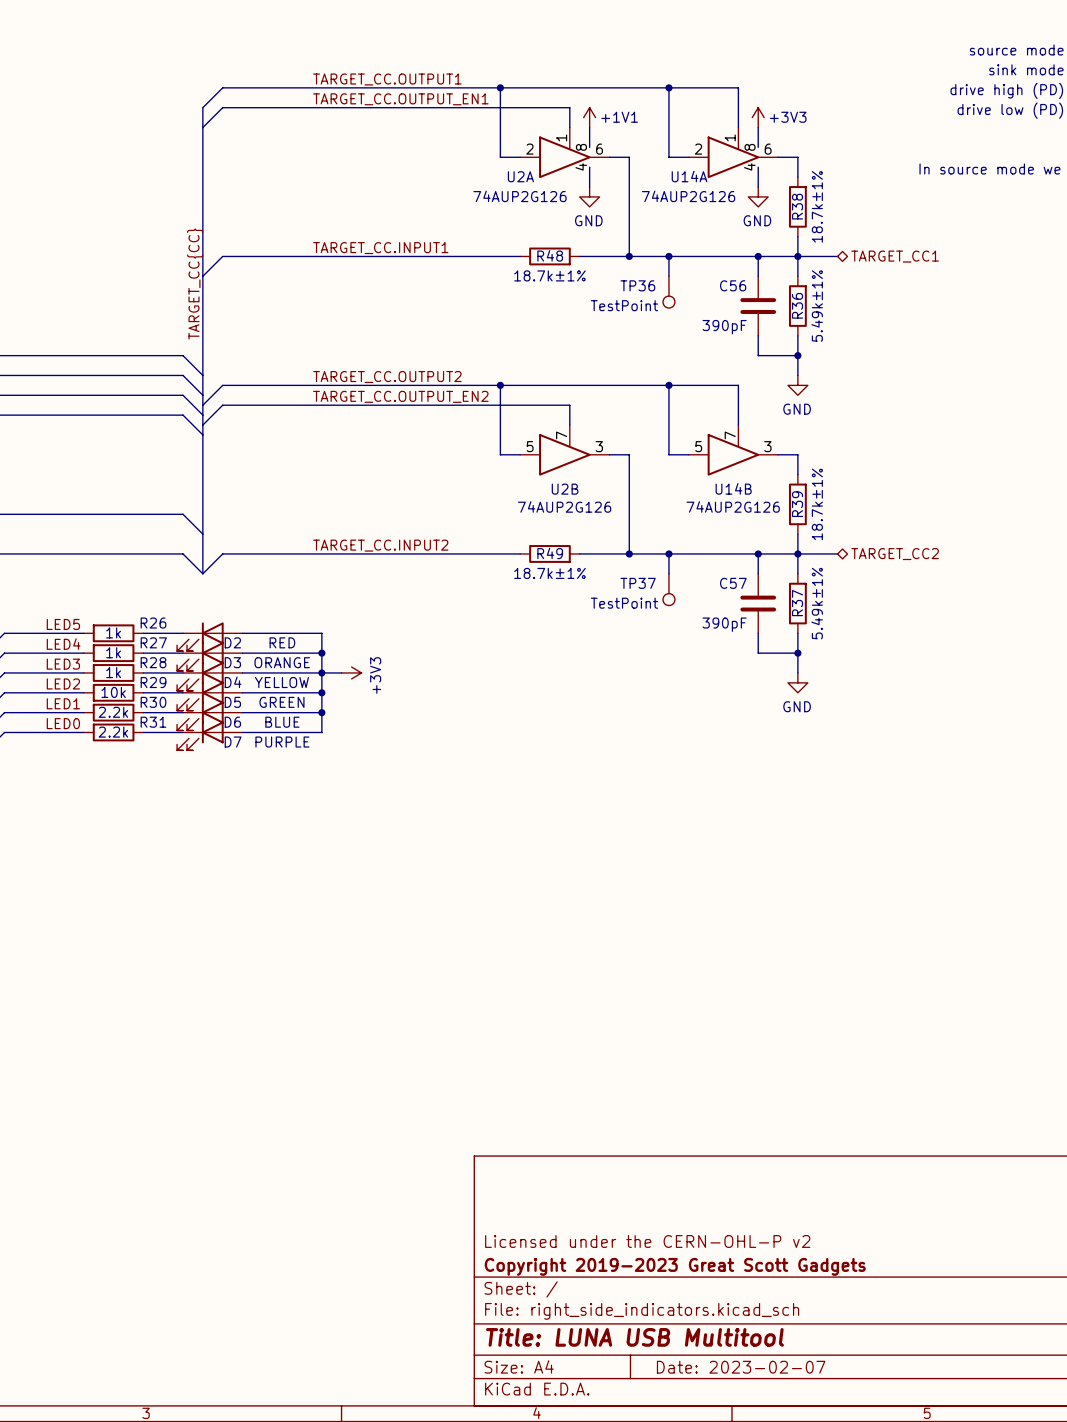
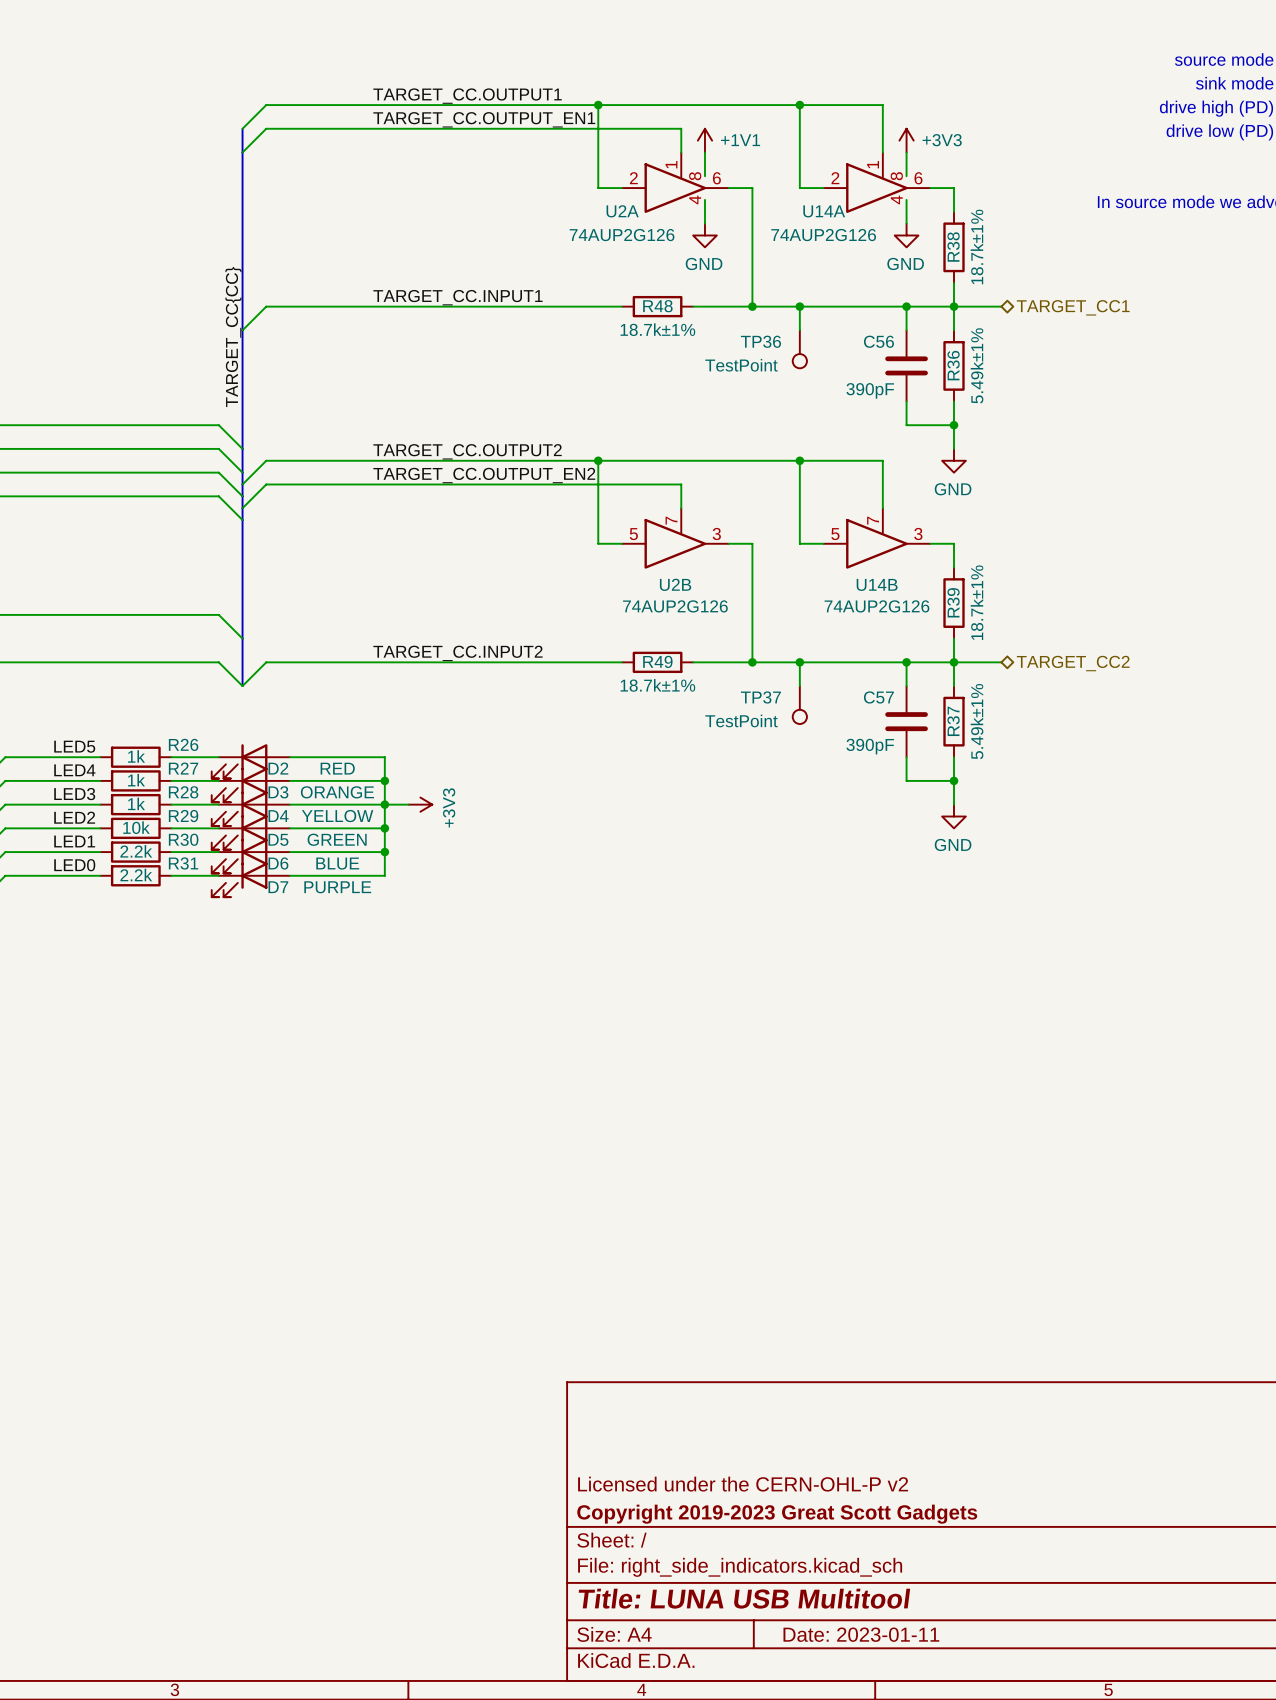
title block: Date: 2023-02-07 (741, 1367) -> Date: 2023-01-11 (861, 1634)

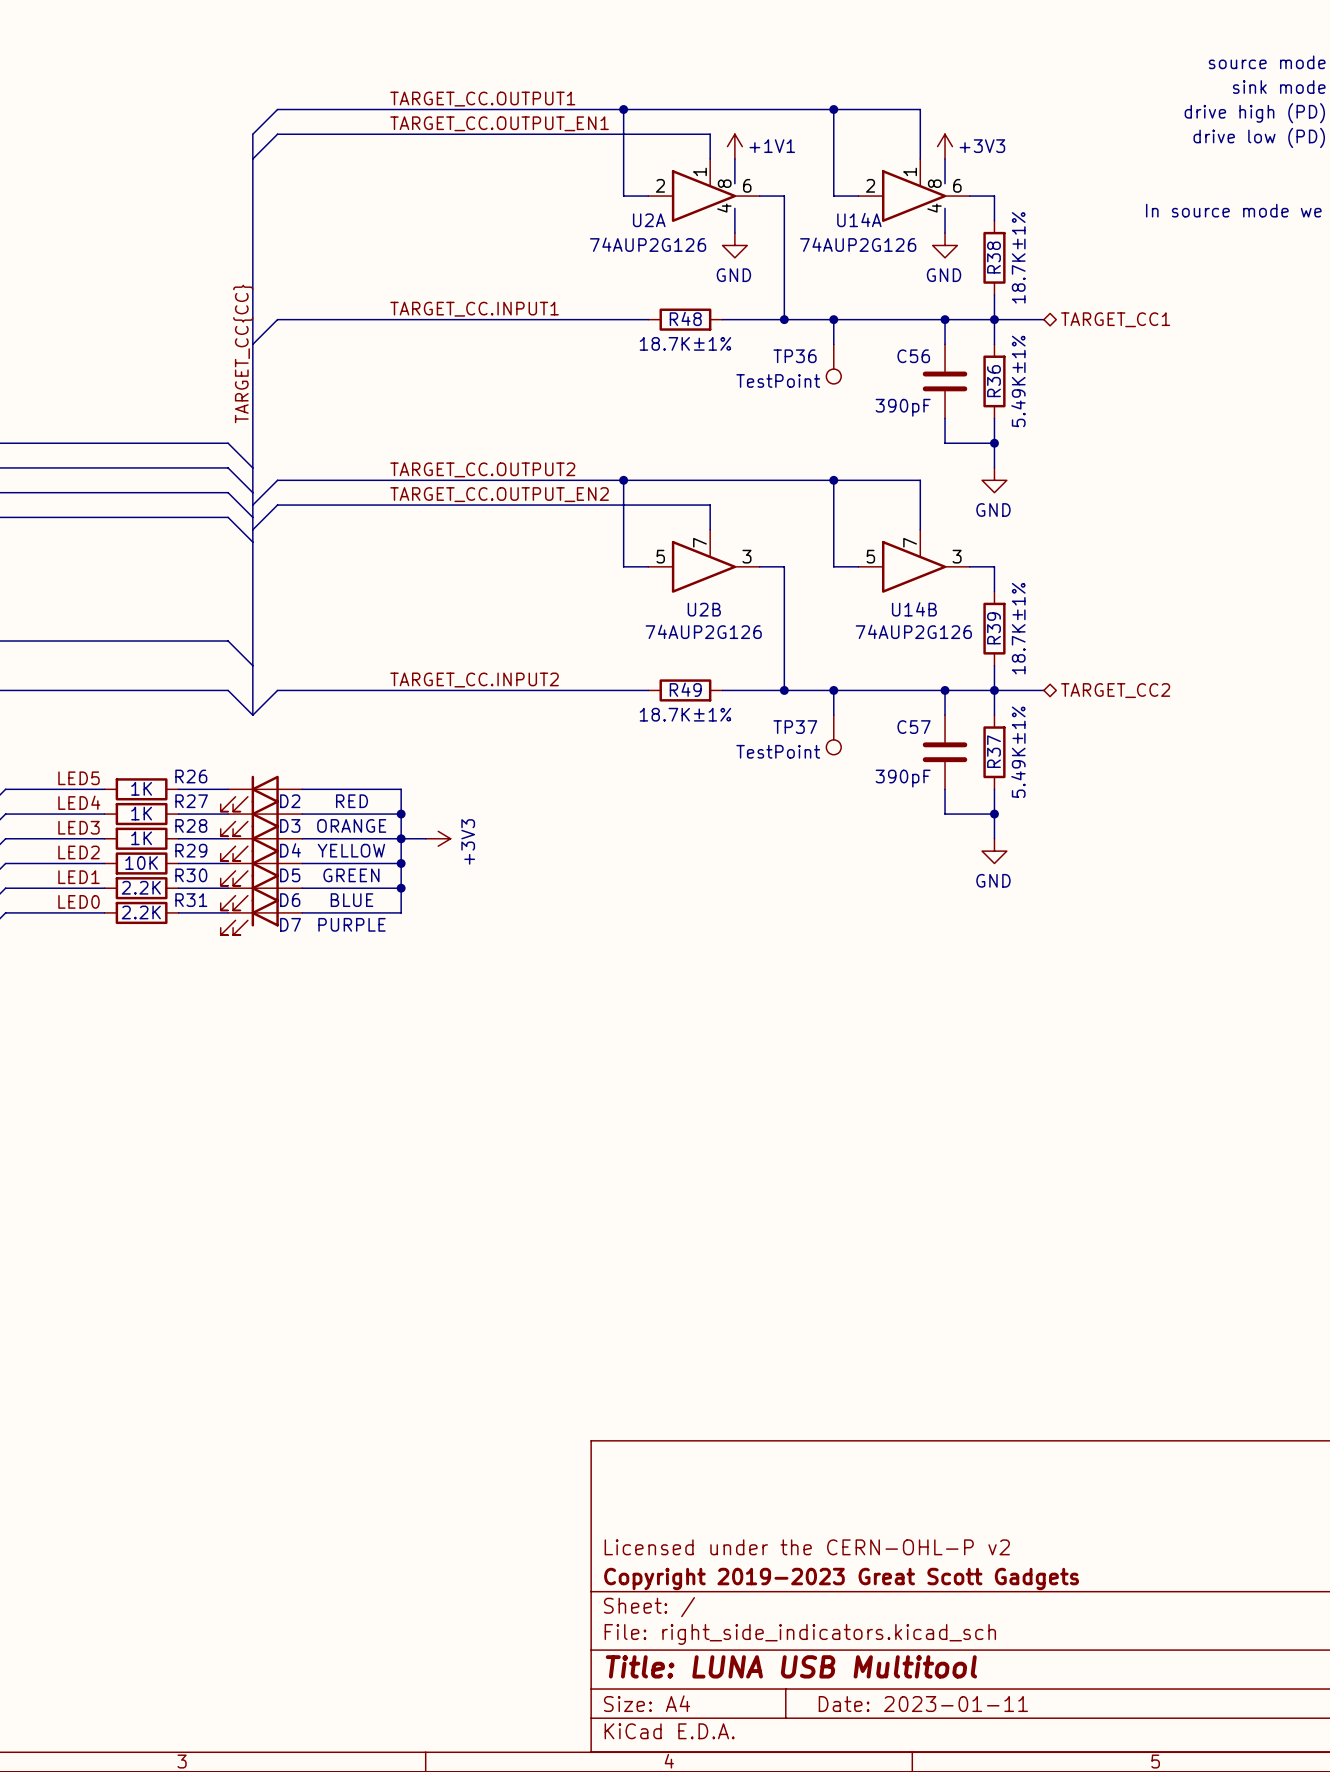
R38 value: 18.7k±1% (977, 246) -> 18.7K±1% (1018, 257)
R48 value: 18.7k±1% (657, 329) -> 18.7K±1% (685, 343)
R36 value: 5.49k±1% (977, 365) -> 5.49K±1% (1018, 381)
R39 value: 18.7k±1% (977, 602) -> 18.7K±1% (1018, 628)
R49 value: 18.7k±1% (657, 685) -> 18.7K±1% (685, 714)
R37 value: 5.49k±1% (977, 721) -> 5.49K±1% (1018, 752)
R26 value: 1k (136, 756) -> 1K (141, 788)
R27 value: 1k (136, 780) -> 1K (141, 813)
R28 value: 1k (136, 803) -> 1K (141, 838)
R29 value: 10k (136, 827) -> 10K (141, 863)
R30 value: 2.2k (136, 851) -> 2.2K (141, 887)
R31 value: 2.2k (136, 875) -> 2.2K (141, 912)

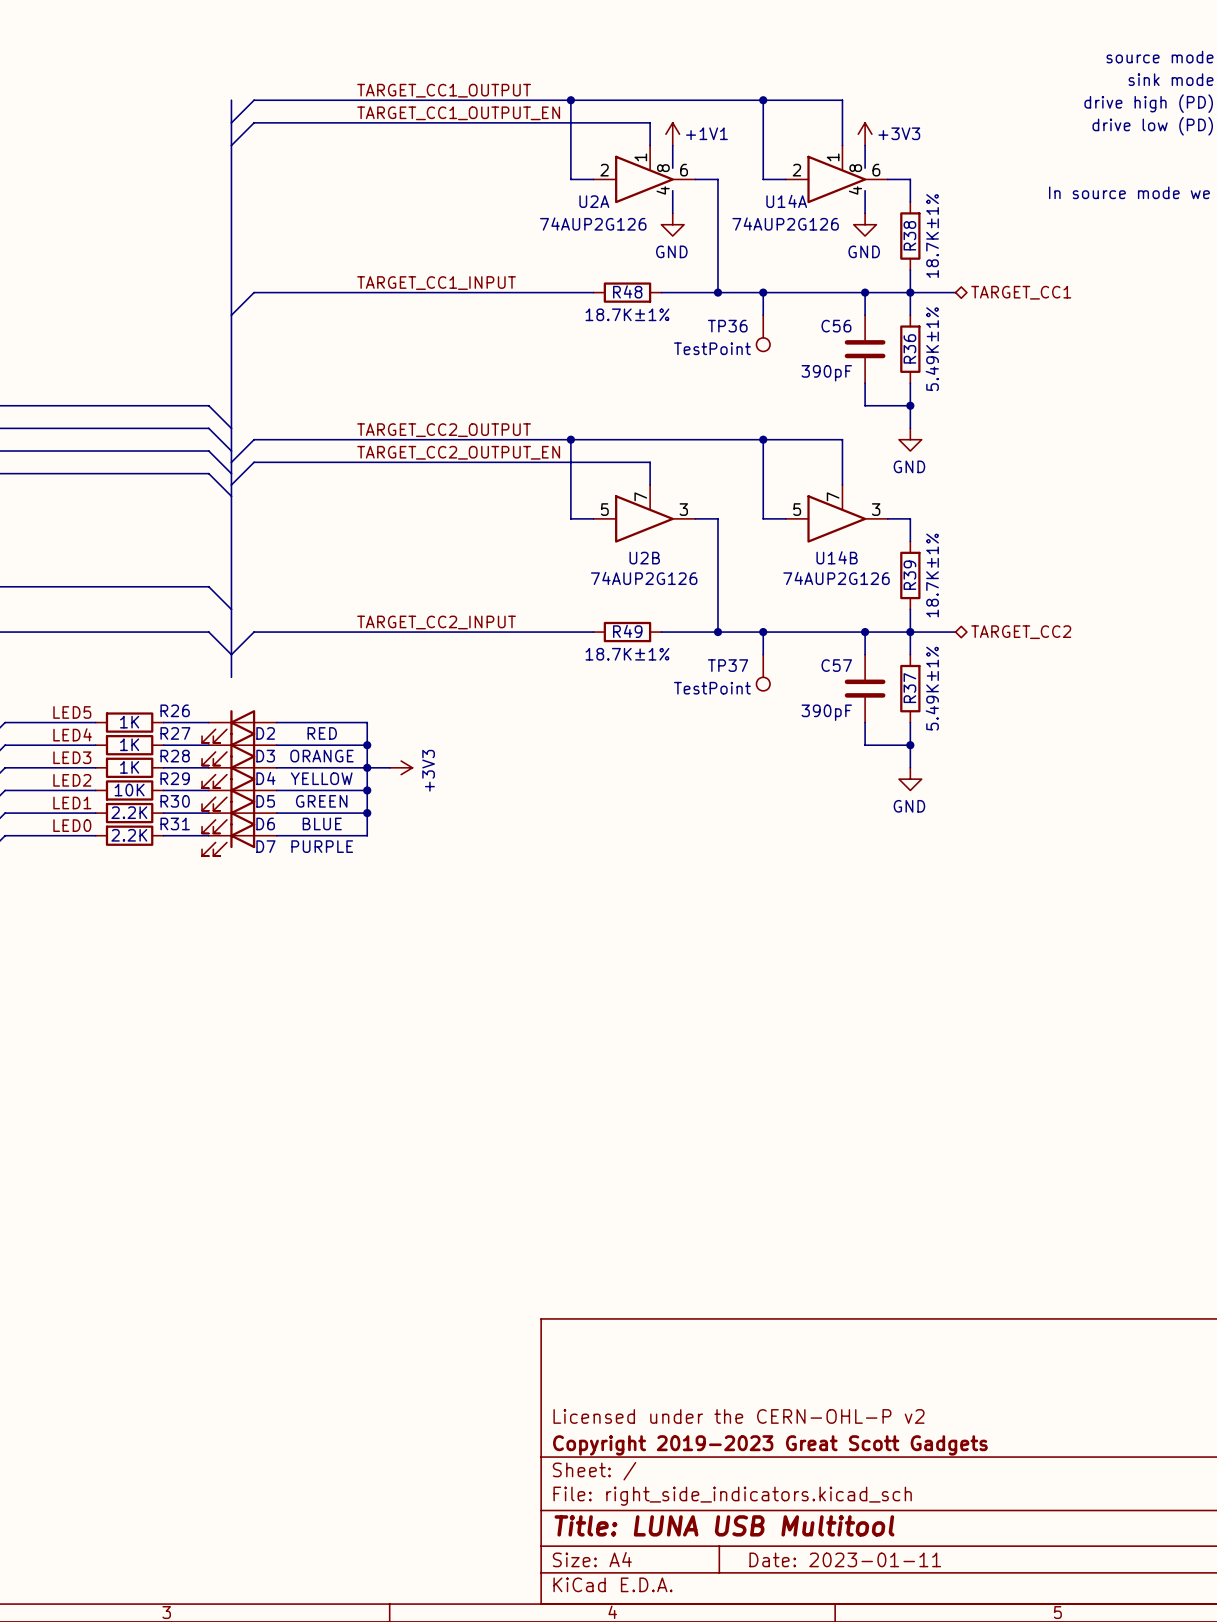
label: TARGET_CC.OUTPUT1 (482, 99) -> TARGET_CC1_OUTPUT (444, 90)
bus: none -> (231, 100) (231, 122)
label: TARGET_CC.OUTPUT_EN1 (499, 123) -> TARGET_CC1_OUTPUT_EN (458, 113)
label: TARGET_CC.INPUT1 (474, 309) -> TARGET_CC1_INPUT (436, 283)
label: TARGET_CC{CC} (243, 353) -> none
label: TARGET_CC.OUTPUT2 (482, 469) -> TARGET_CC2_OUTPUT (444, 430)
label: TARGET_CC.OUTPUT_EN2 (499, 494) -> TARGET_CC2_OUTPUT_EN (458, 452)
label: TARGET_CC.INPUT2 (474, 680) -> TARGET_CC2_INPUT (436, 622)
bus: none -> (231, 654) (231, 677)

